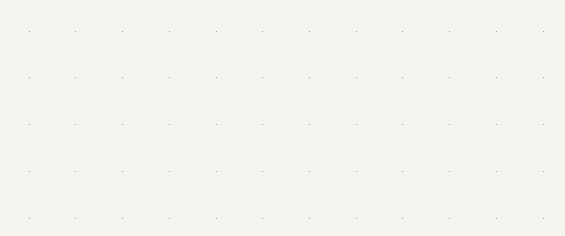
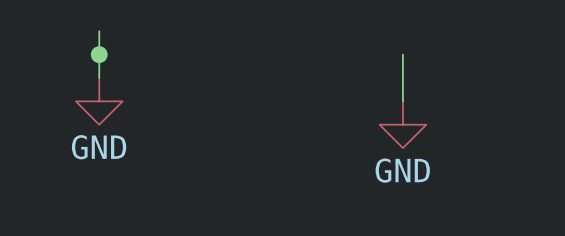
wire: none -> (99, 31) (99, 77)
junction: none -> (99, 54)
wire: none -> (402, 54) (402, 101)
power symbol: none -> GND (99, 101)
power symbol: none -> GND (402, 124)

